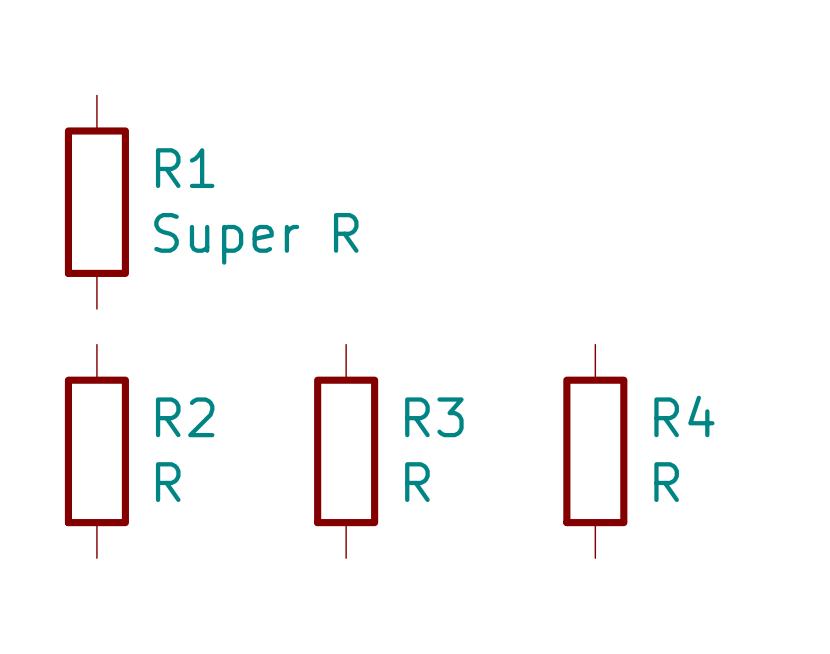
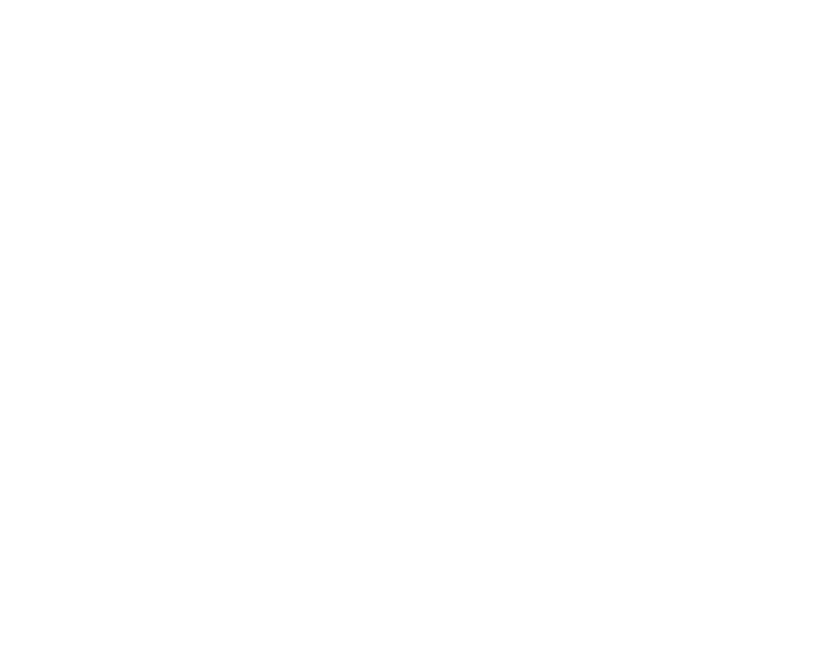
R1: Super R (96, 202) -> none
R2: R (96, 451) -> none
R3: R (346, 451) -> none
R4: R (595, 451) -> none

